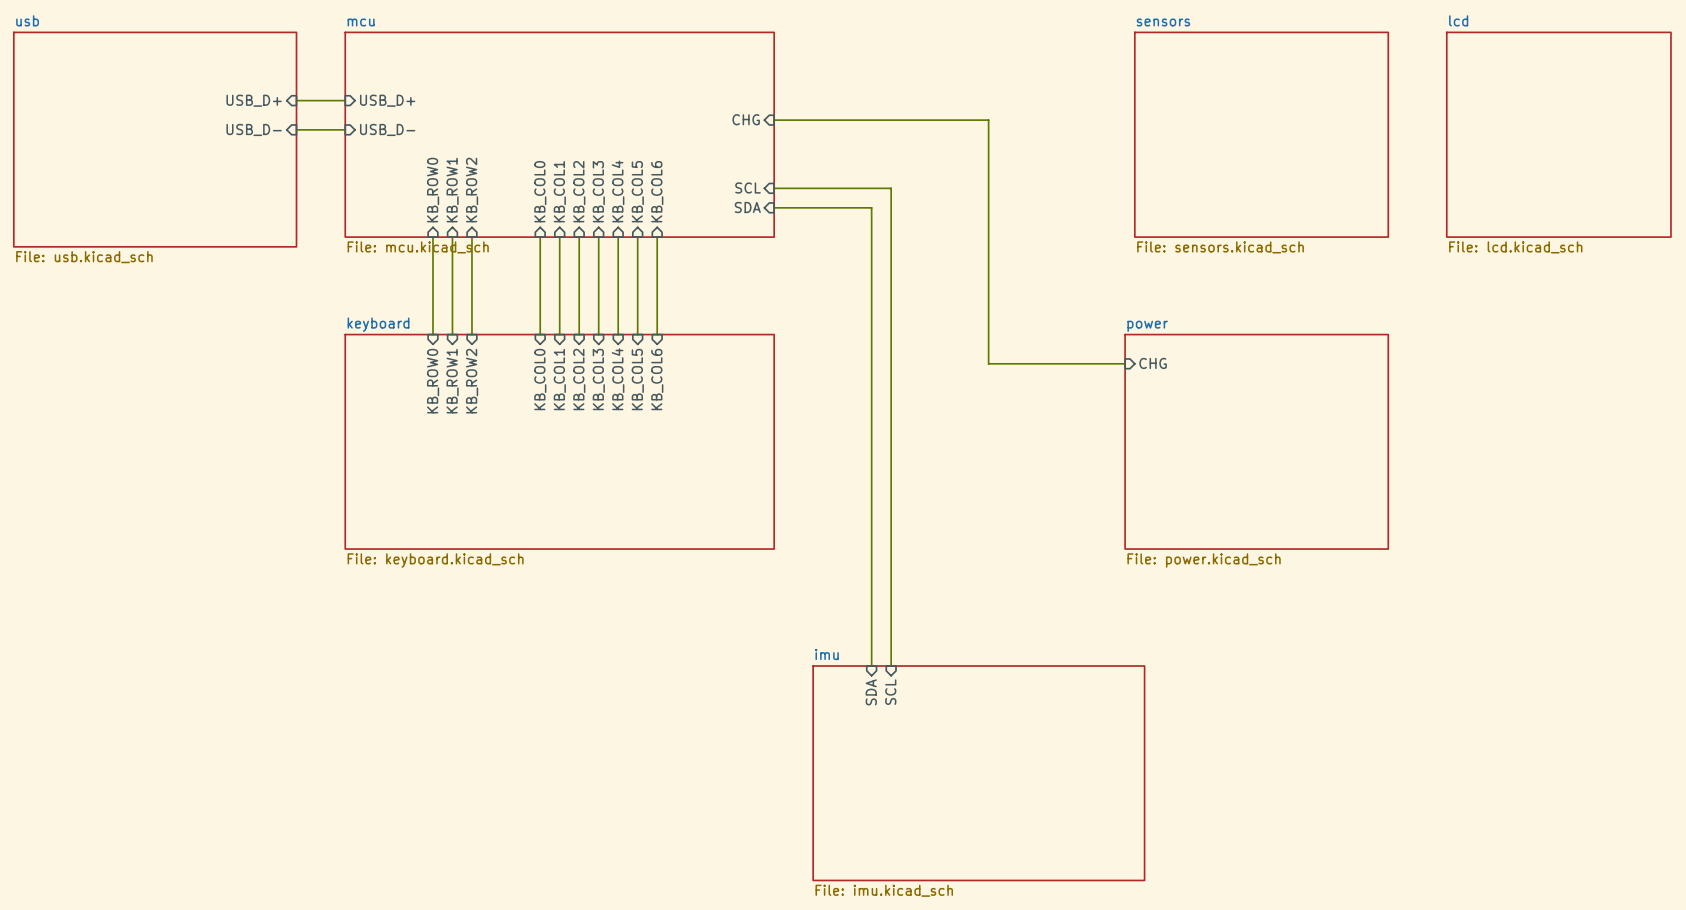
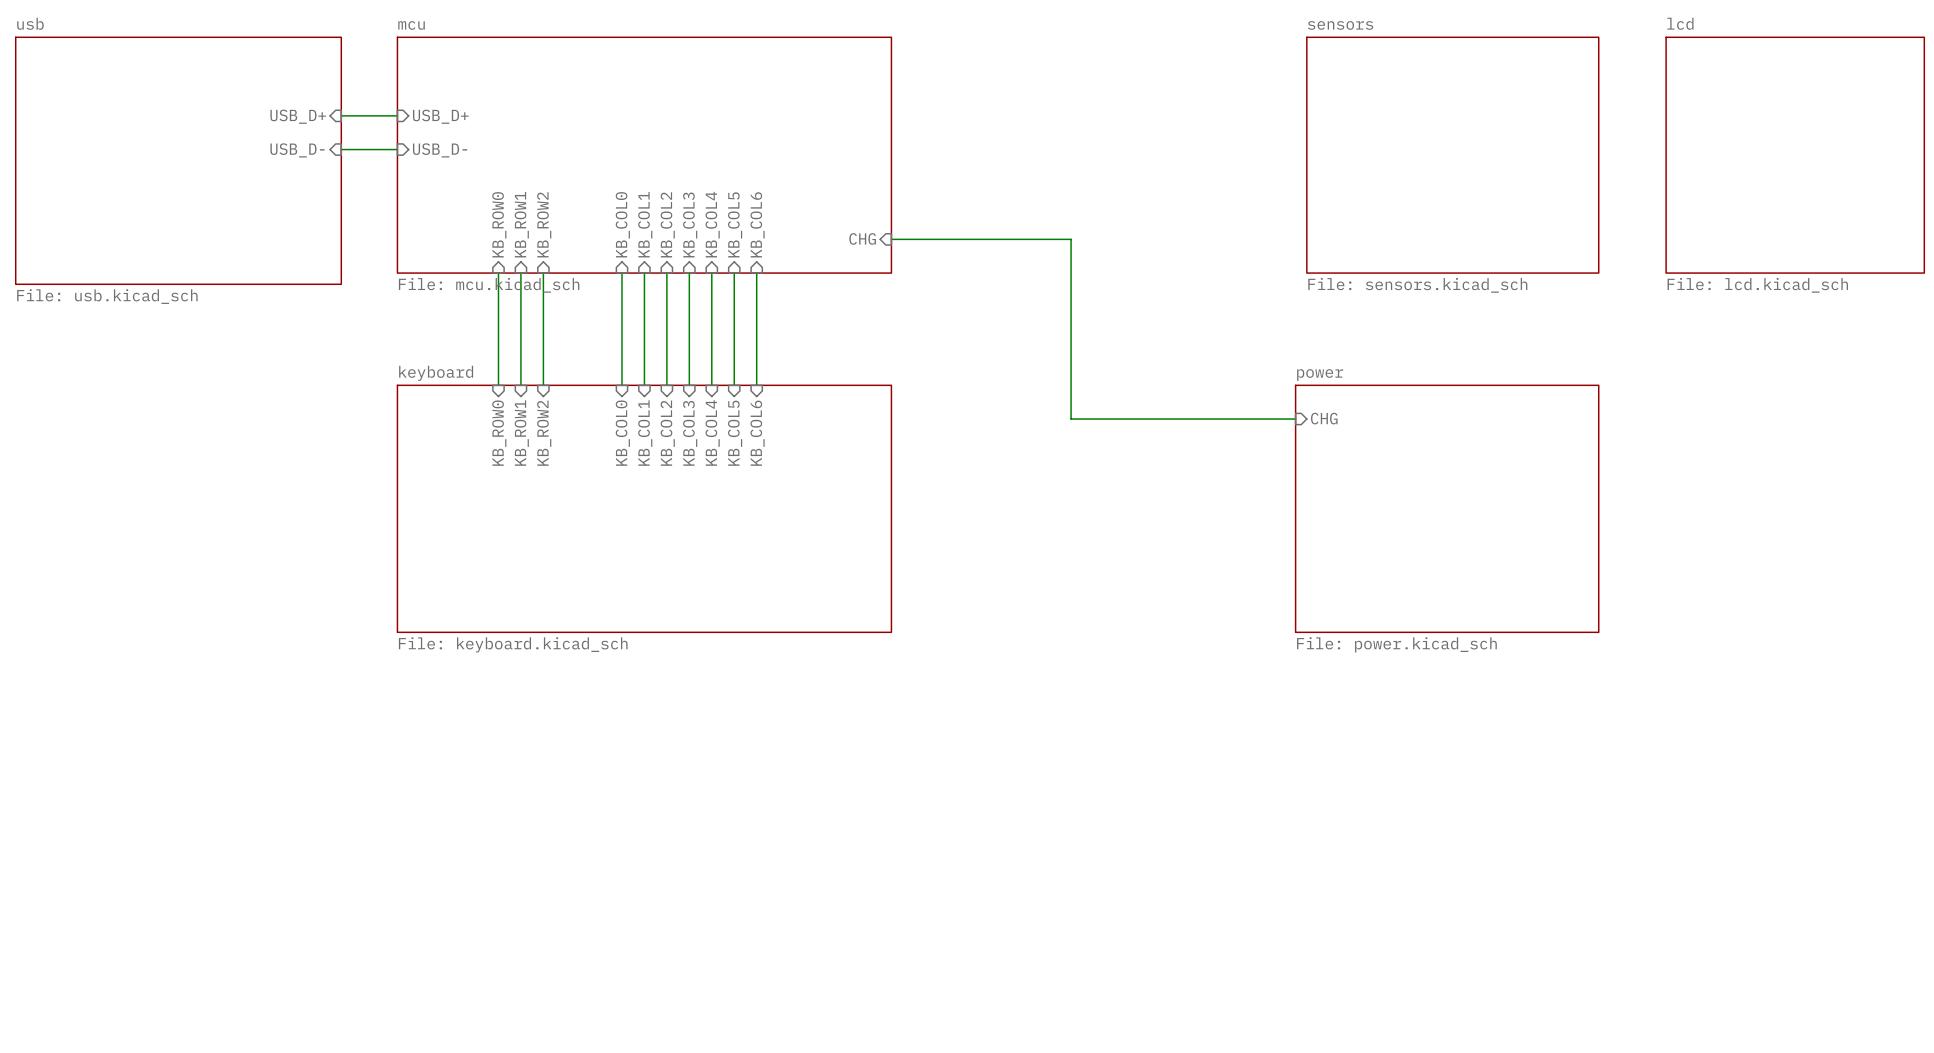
sheet pin: CHG (746, 119) -> none
wire: (774, 120) (988, 120) (988, 363) -> (1003, 239) (1071, 239) (1071, 419) (1138, 419)
sheet pin: SCL (748, 187) -> none
wire: (774, 188) (891, 188) (891, 666) -> none
sheet pin: SDA (747, 207) -> CHG (862, 238)
wire: (871, 207) (871, 666) -> none
sheet pin: SDA (871, 692) -> none
sheet pin: SCL (890, 692) -> none
sheet imu: File: imu.kicad_sch (978, 773) -> none

